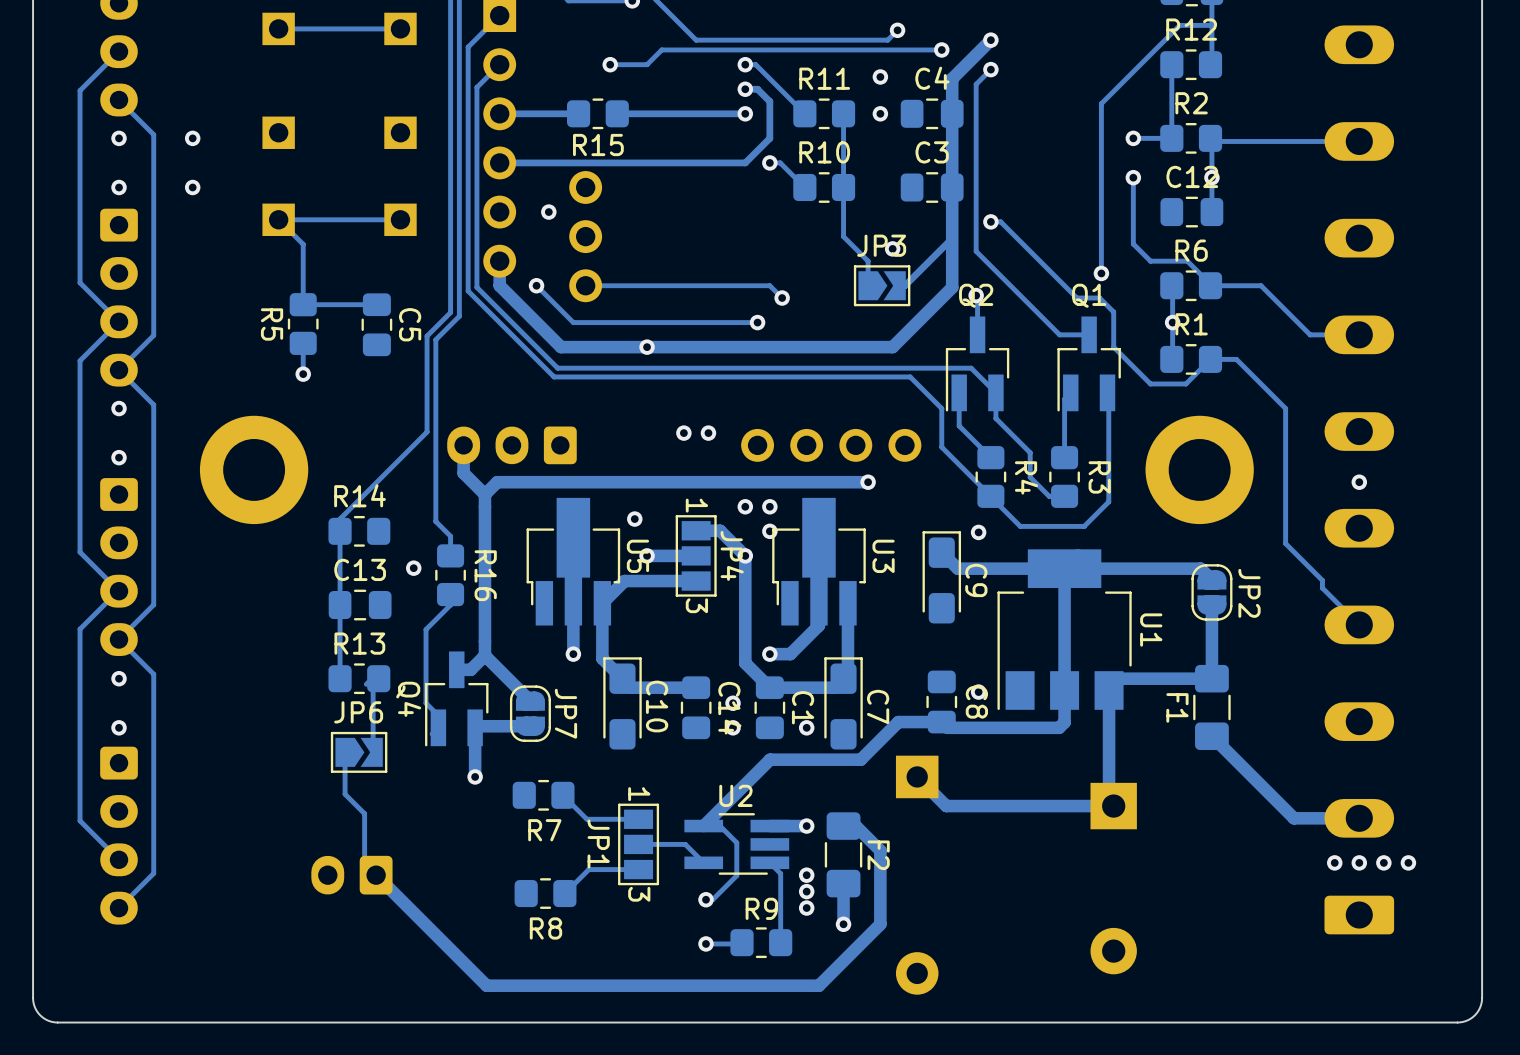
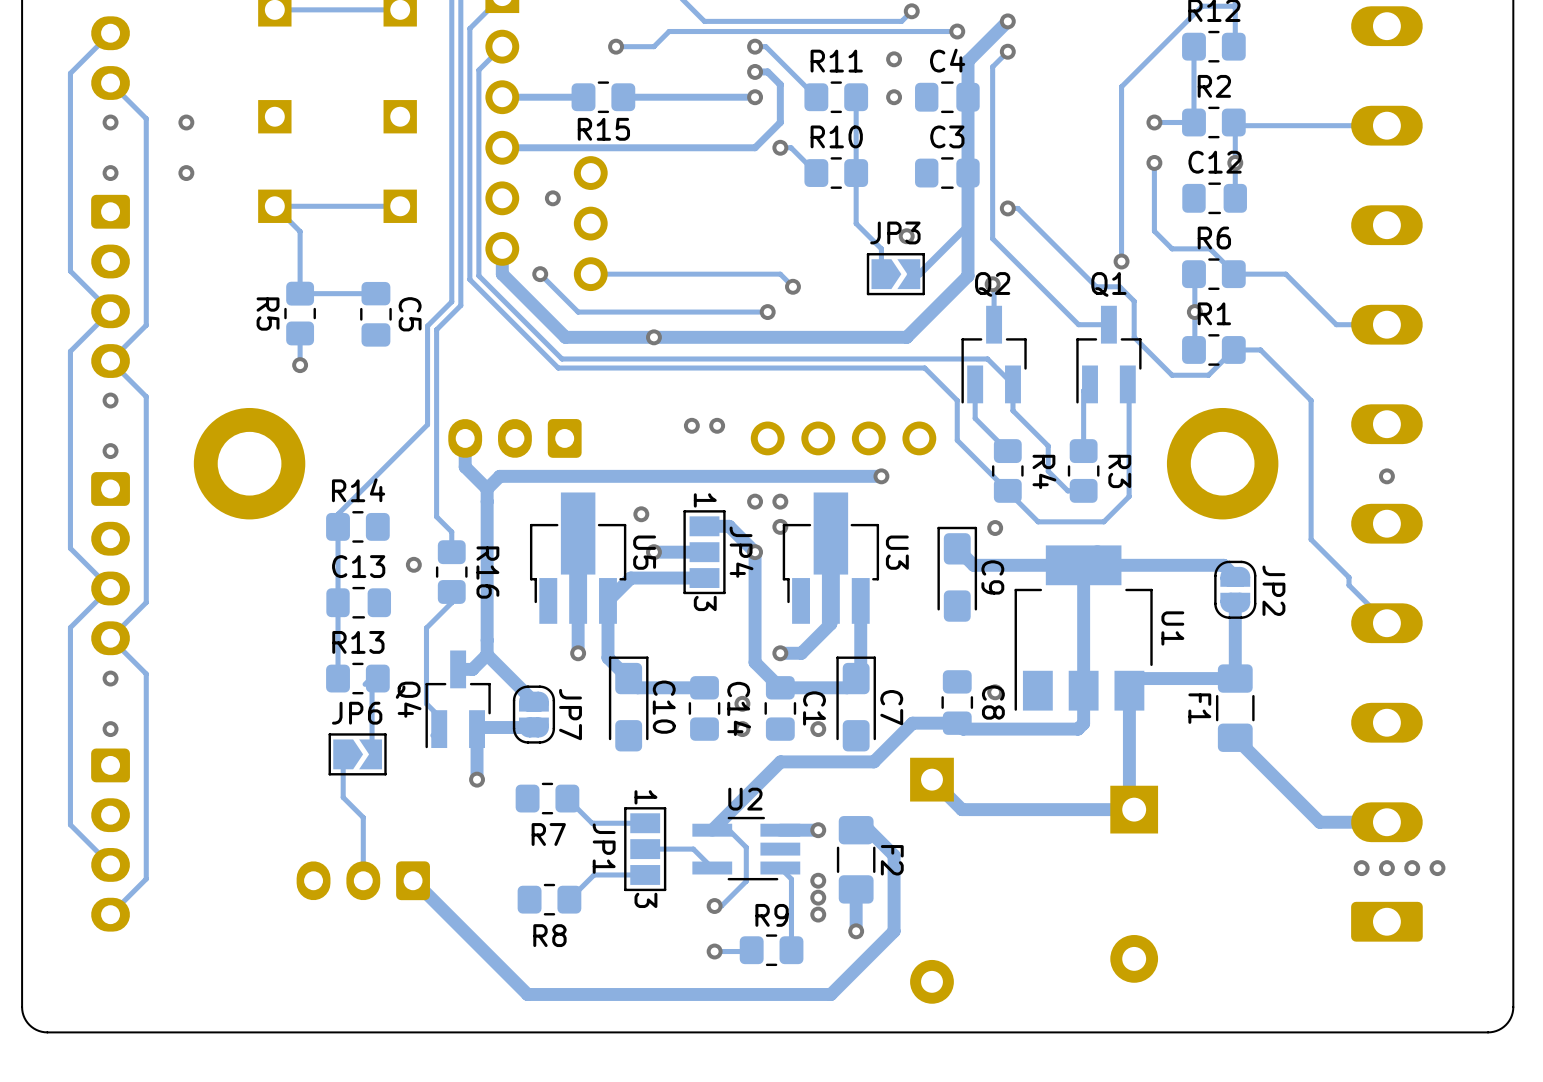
part footprint: [311, 855, 393, 895] -> [296, 861, 430, 901]
track: (376, 875) (486, 985) (524, 985) -> (413, 880) (527, 994)

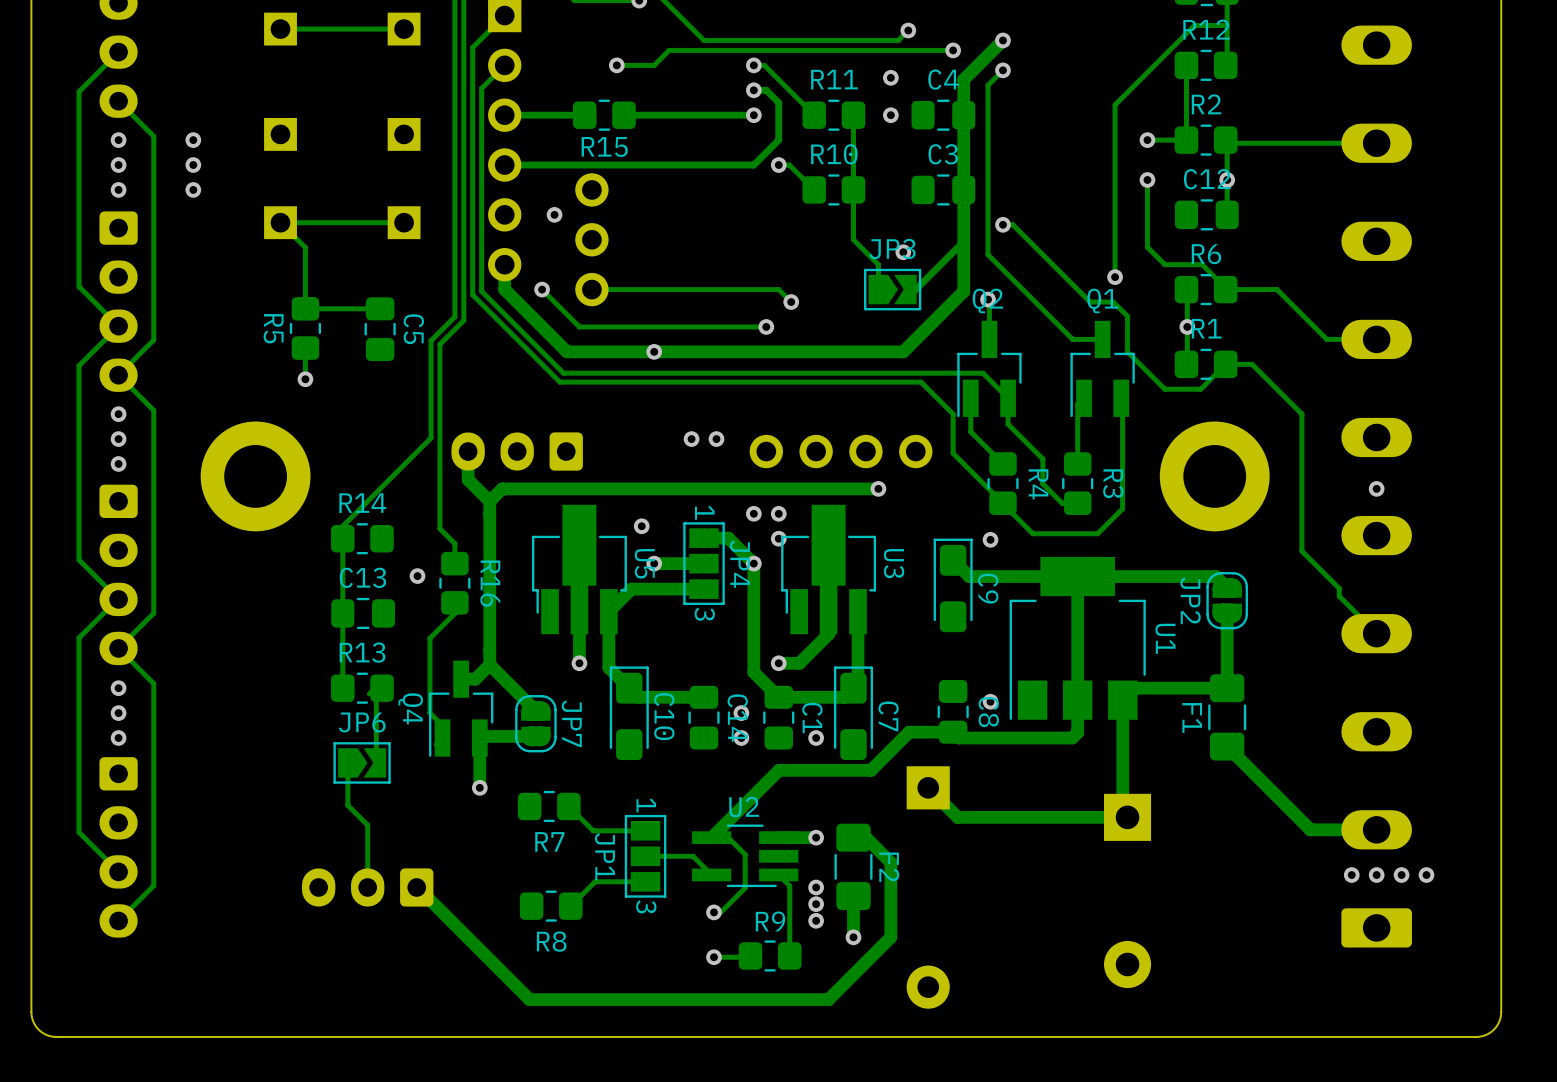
via: none -> (118, 165)
via: none -> (193, 165)
via: none -> (118, 439)
JP2 name position: JP2 (1273, 590) -> JP2 (1190, 600)
via: none -> (118, 713)

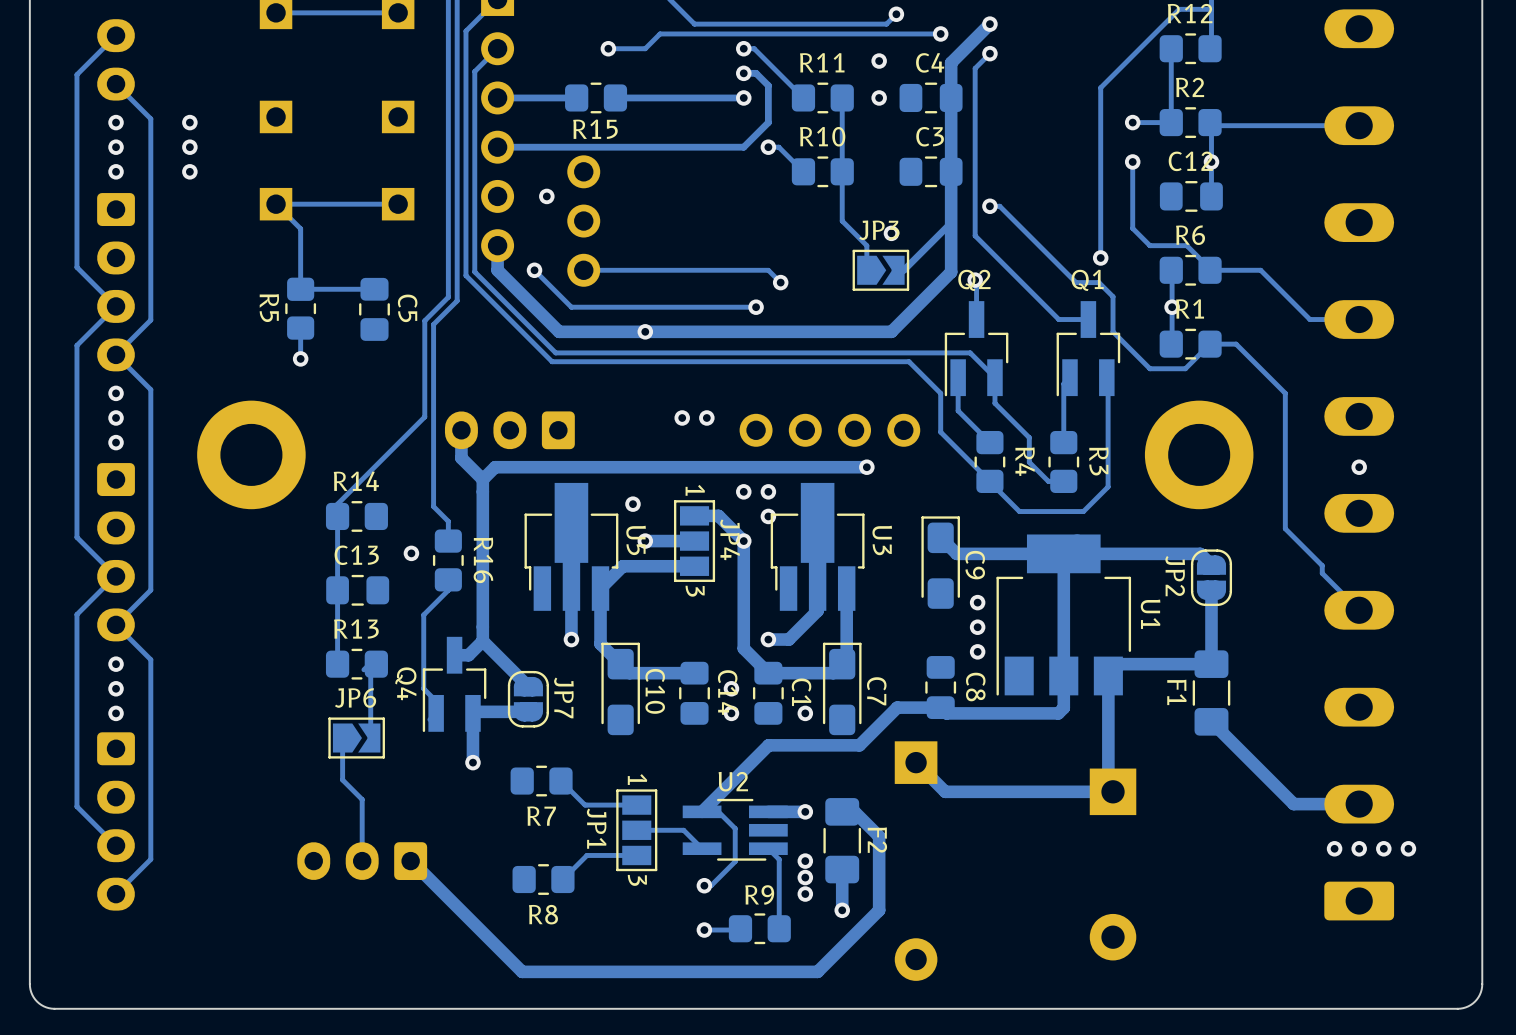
via: (990, 539) -> none
via: none -> (977, 602)
via: none -> (977, 627)
via: none -> (977, 651)
via: (990, 701) -> none

